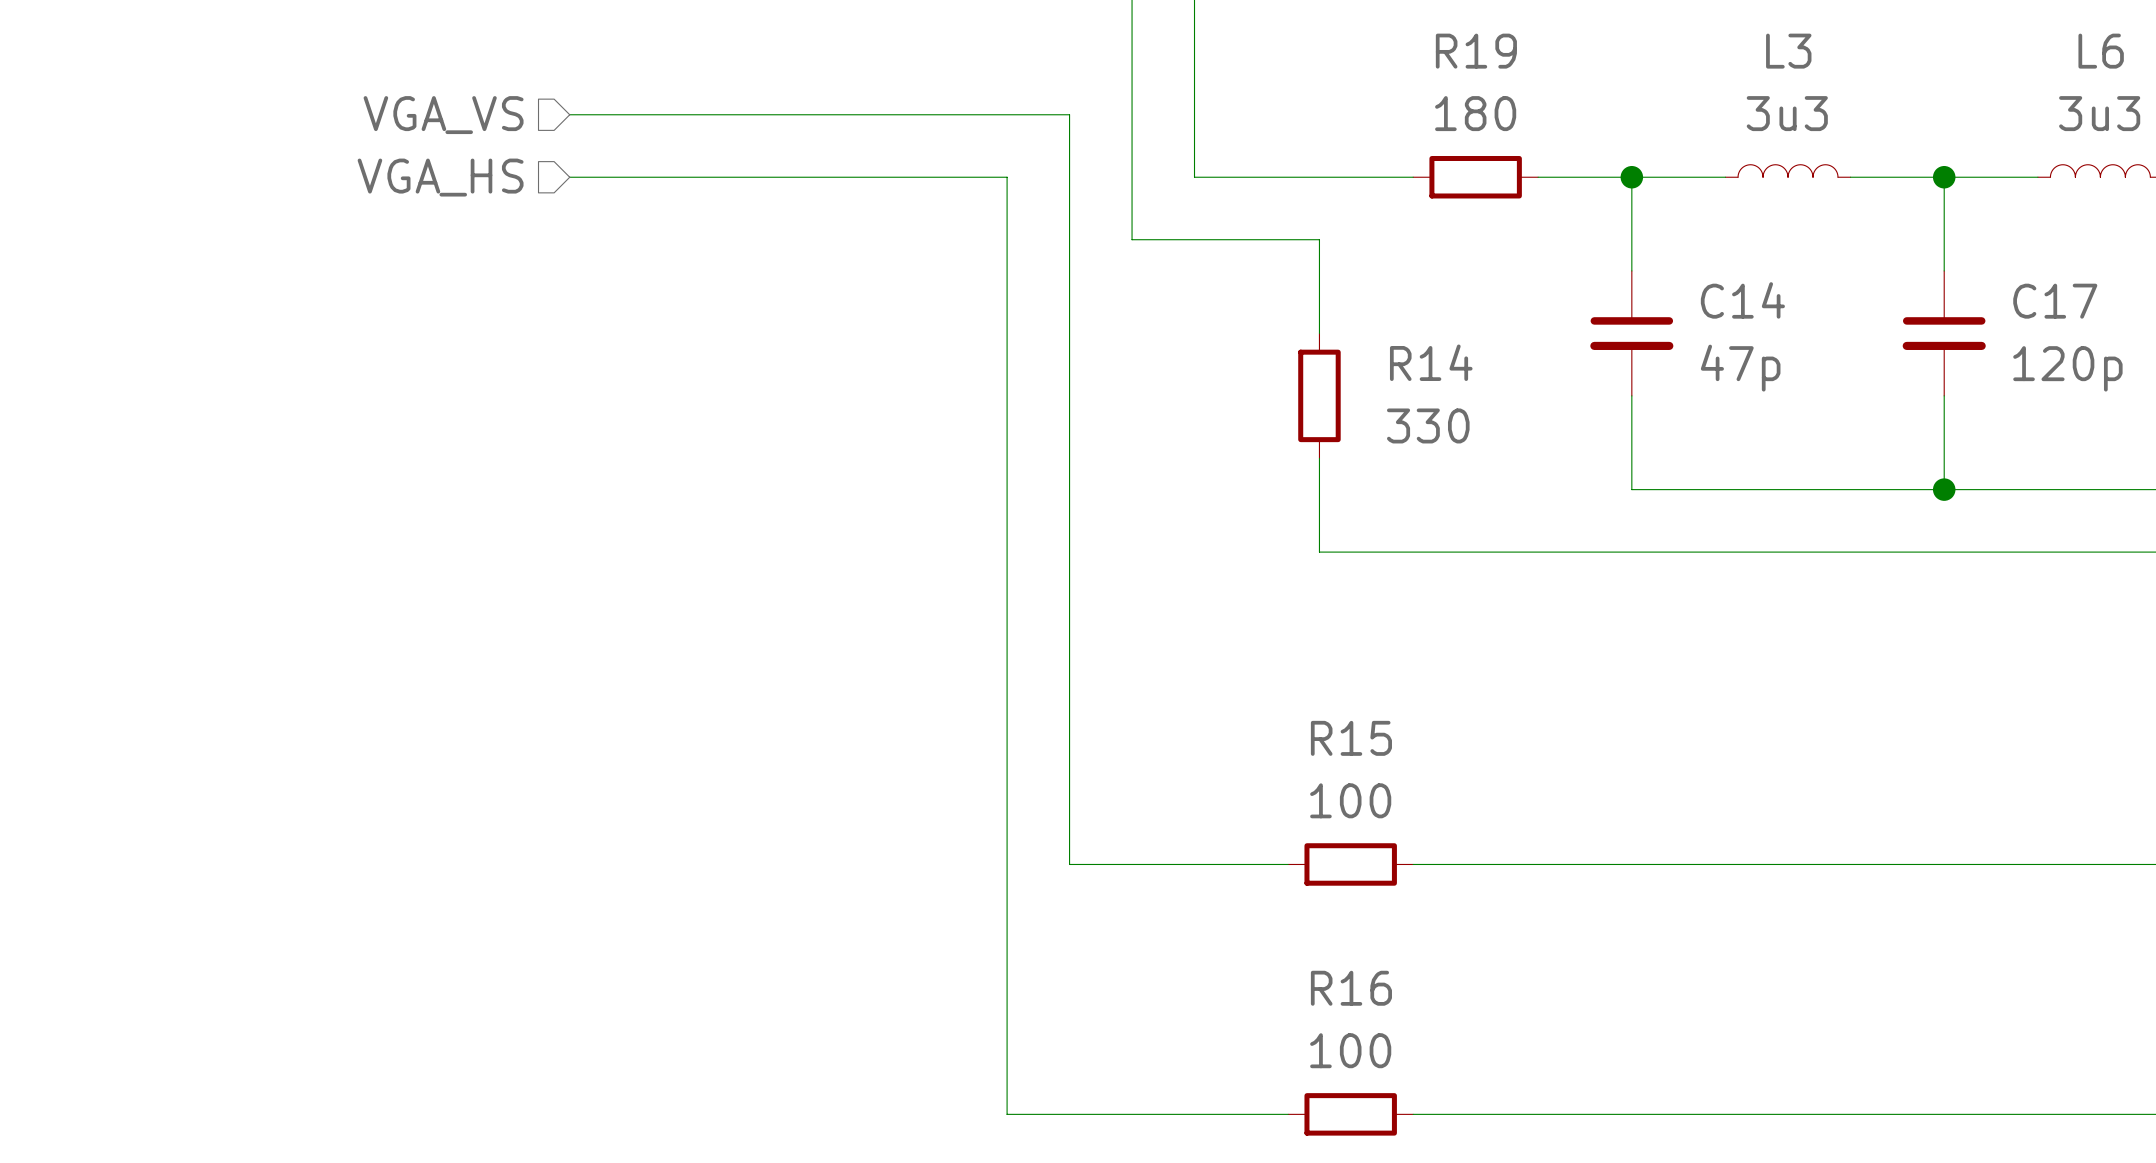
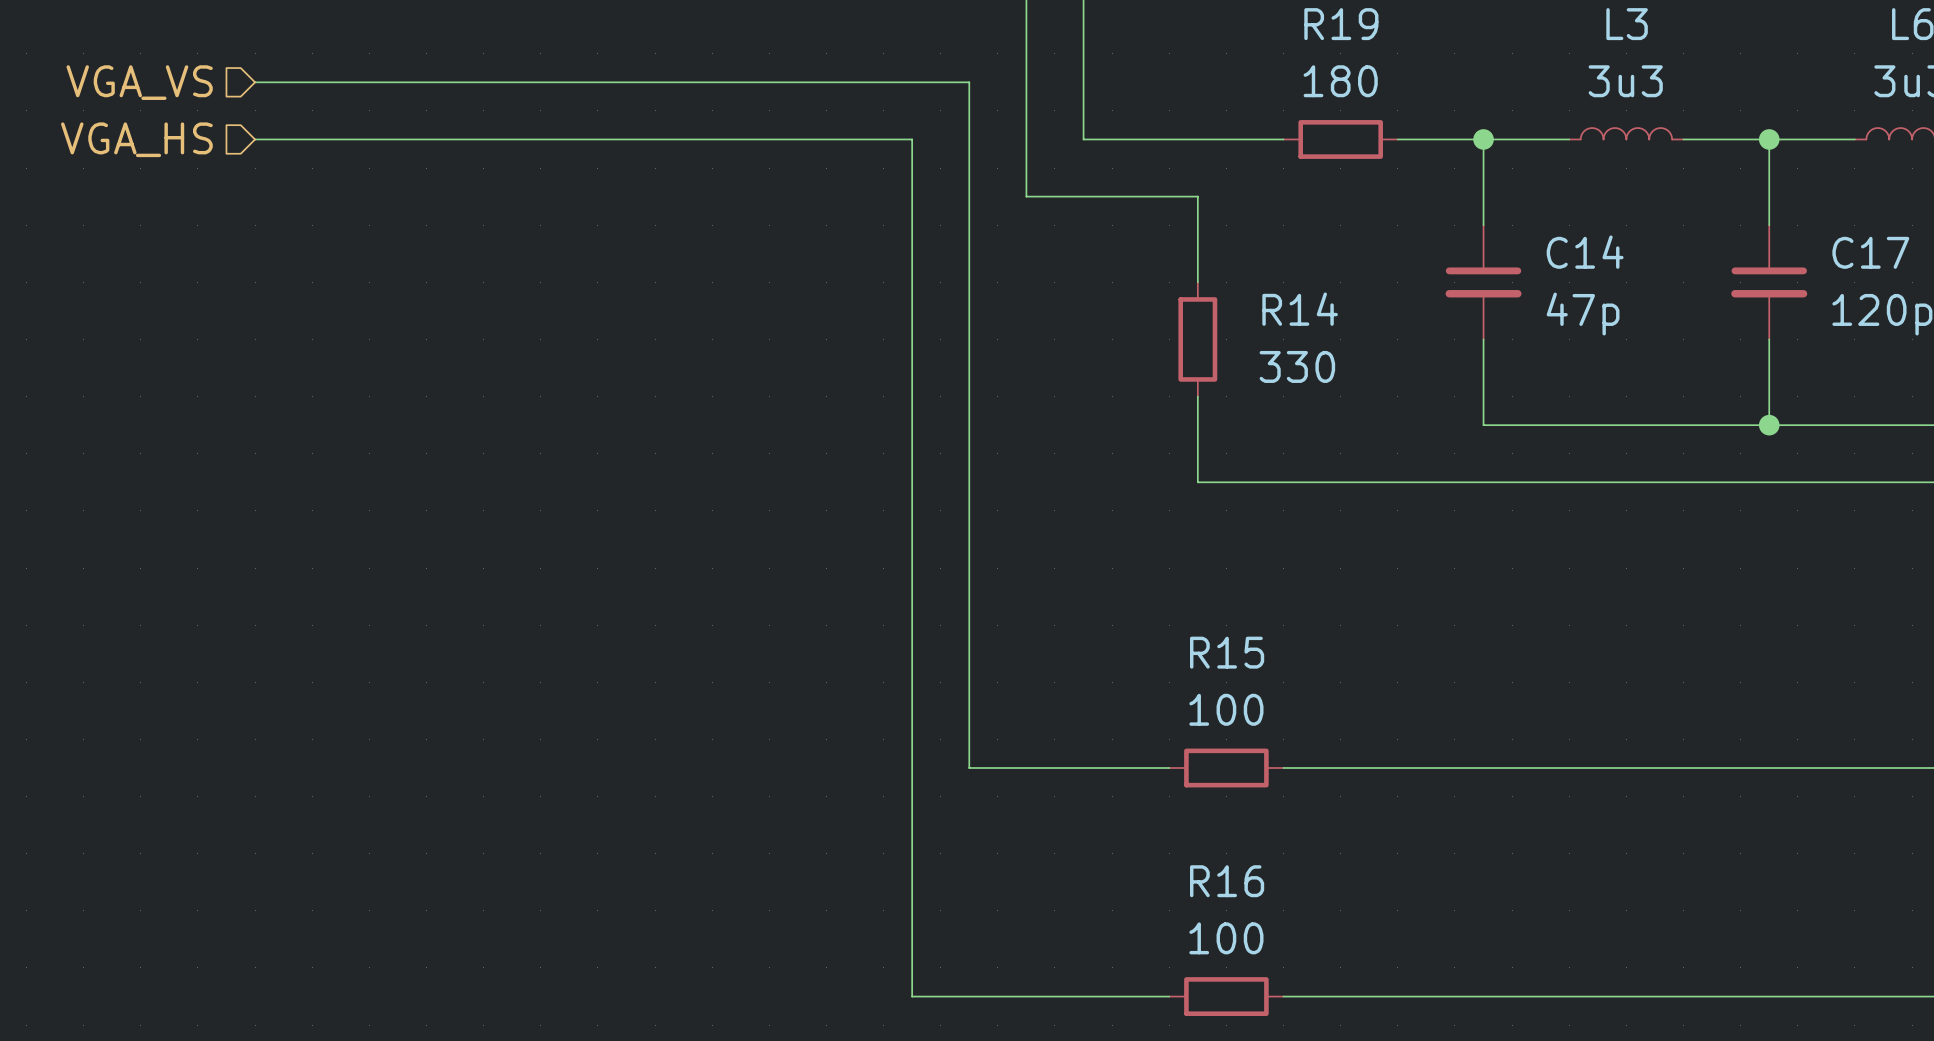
wire: none -> (255, 82) (512, 82)
hierarchical label position: VGA_VS (443, 115) -> VGA_VS (139, 82)
wire: none -> (255, 139) (512, 139)
hierarchical label position: VGA_HS (440, 177) -> VGA_HS (136, 139)

